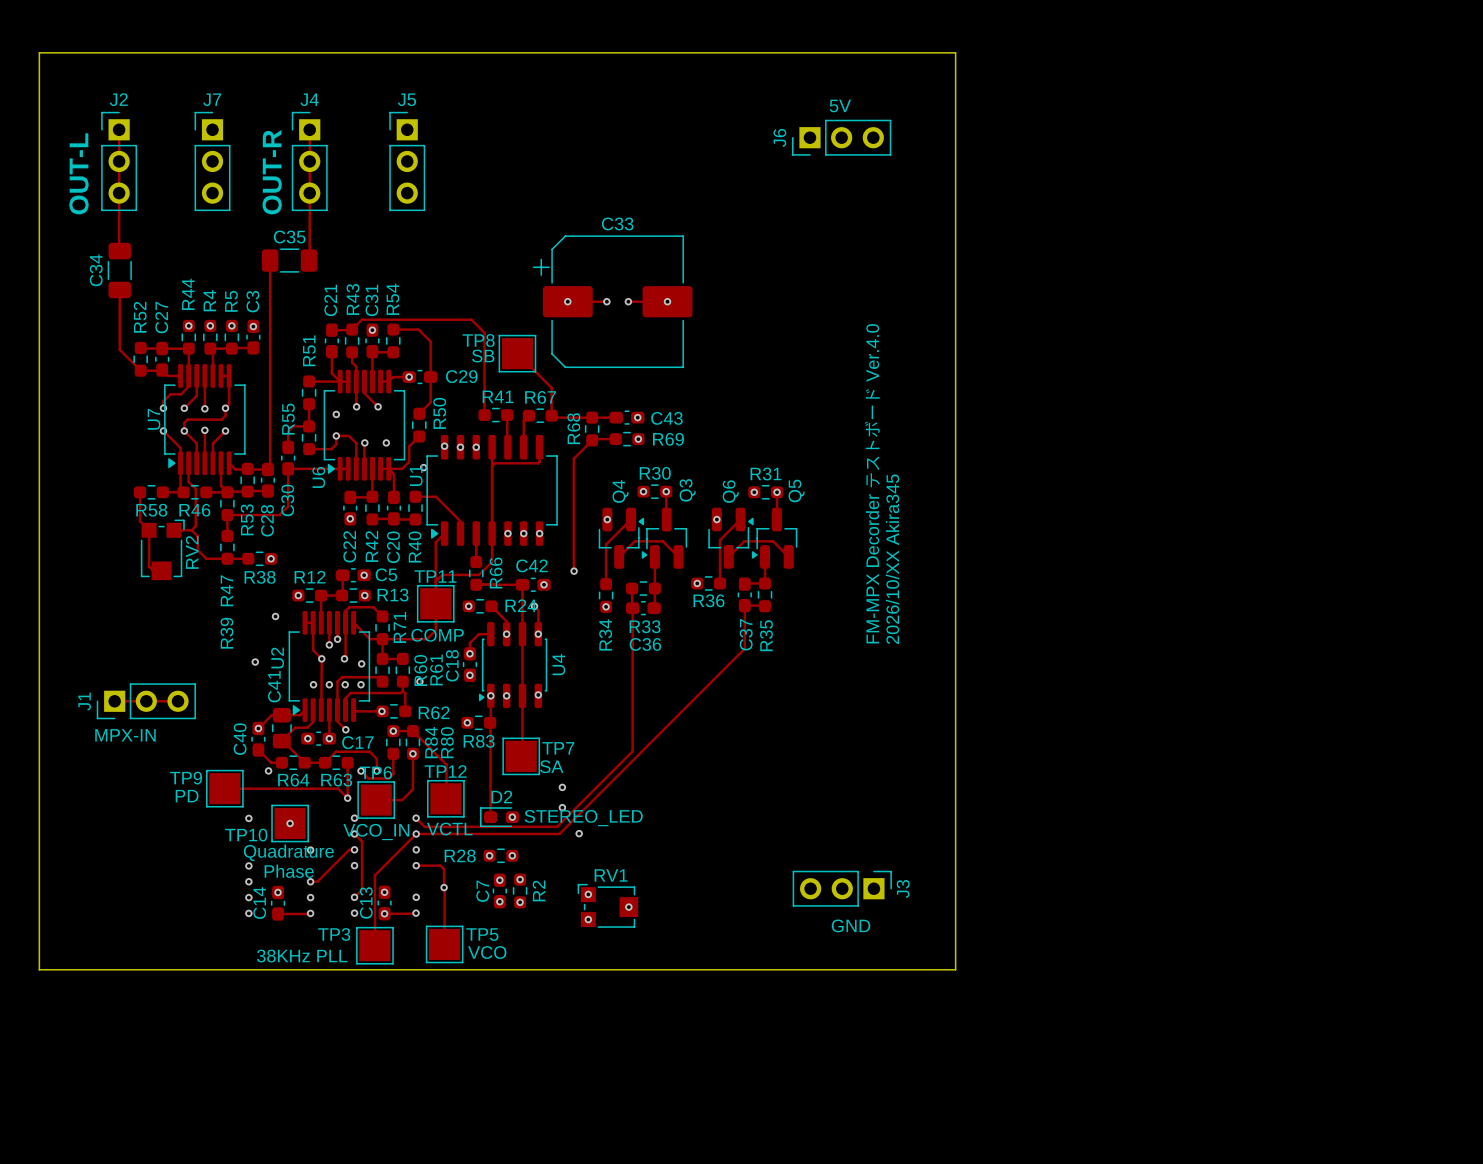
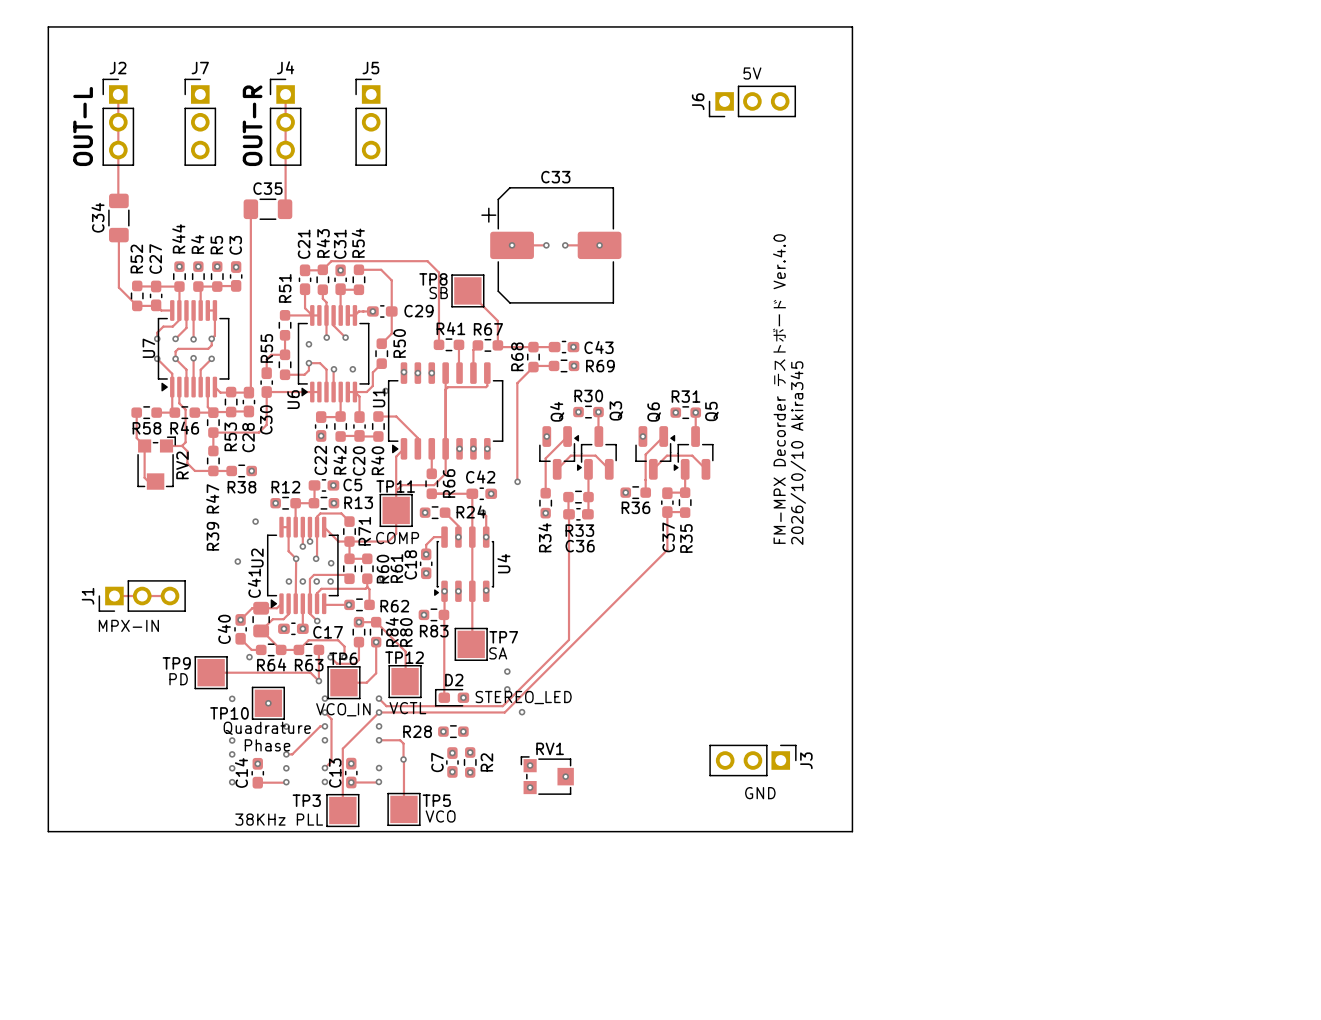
text: 2026/10/XX Akira345 (892, 559) -> 2026/10/10 Akira345 (798, 453)

